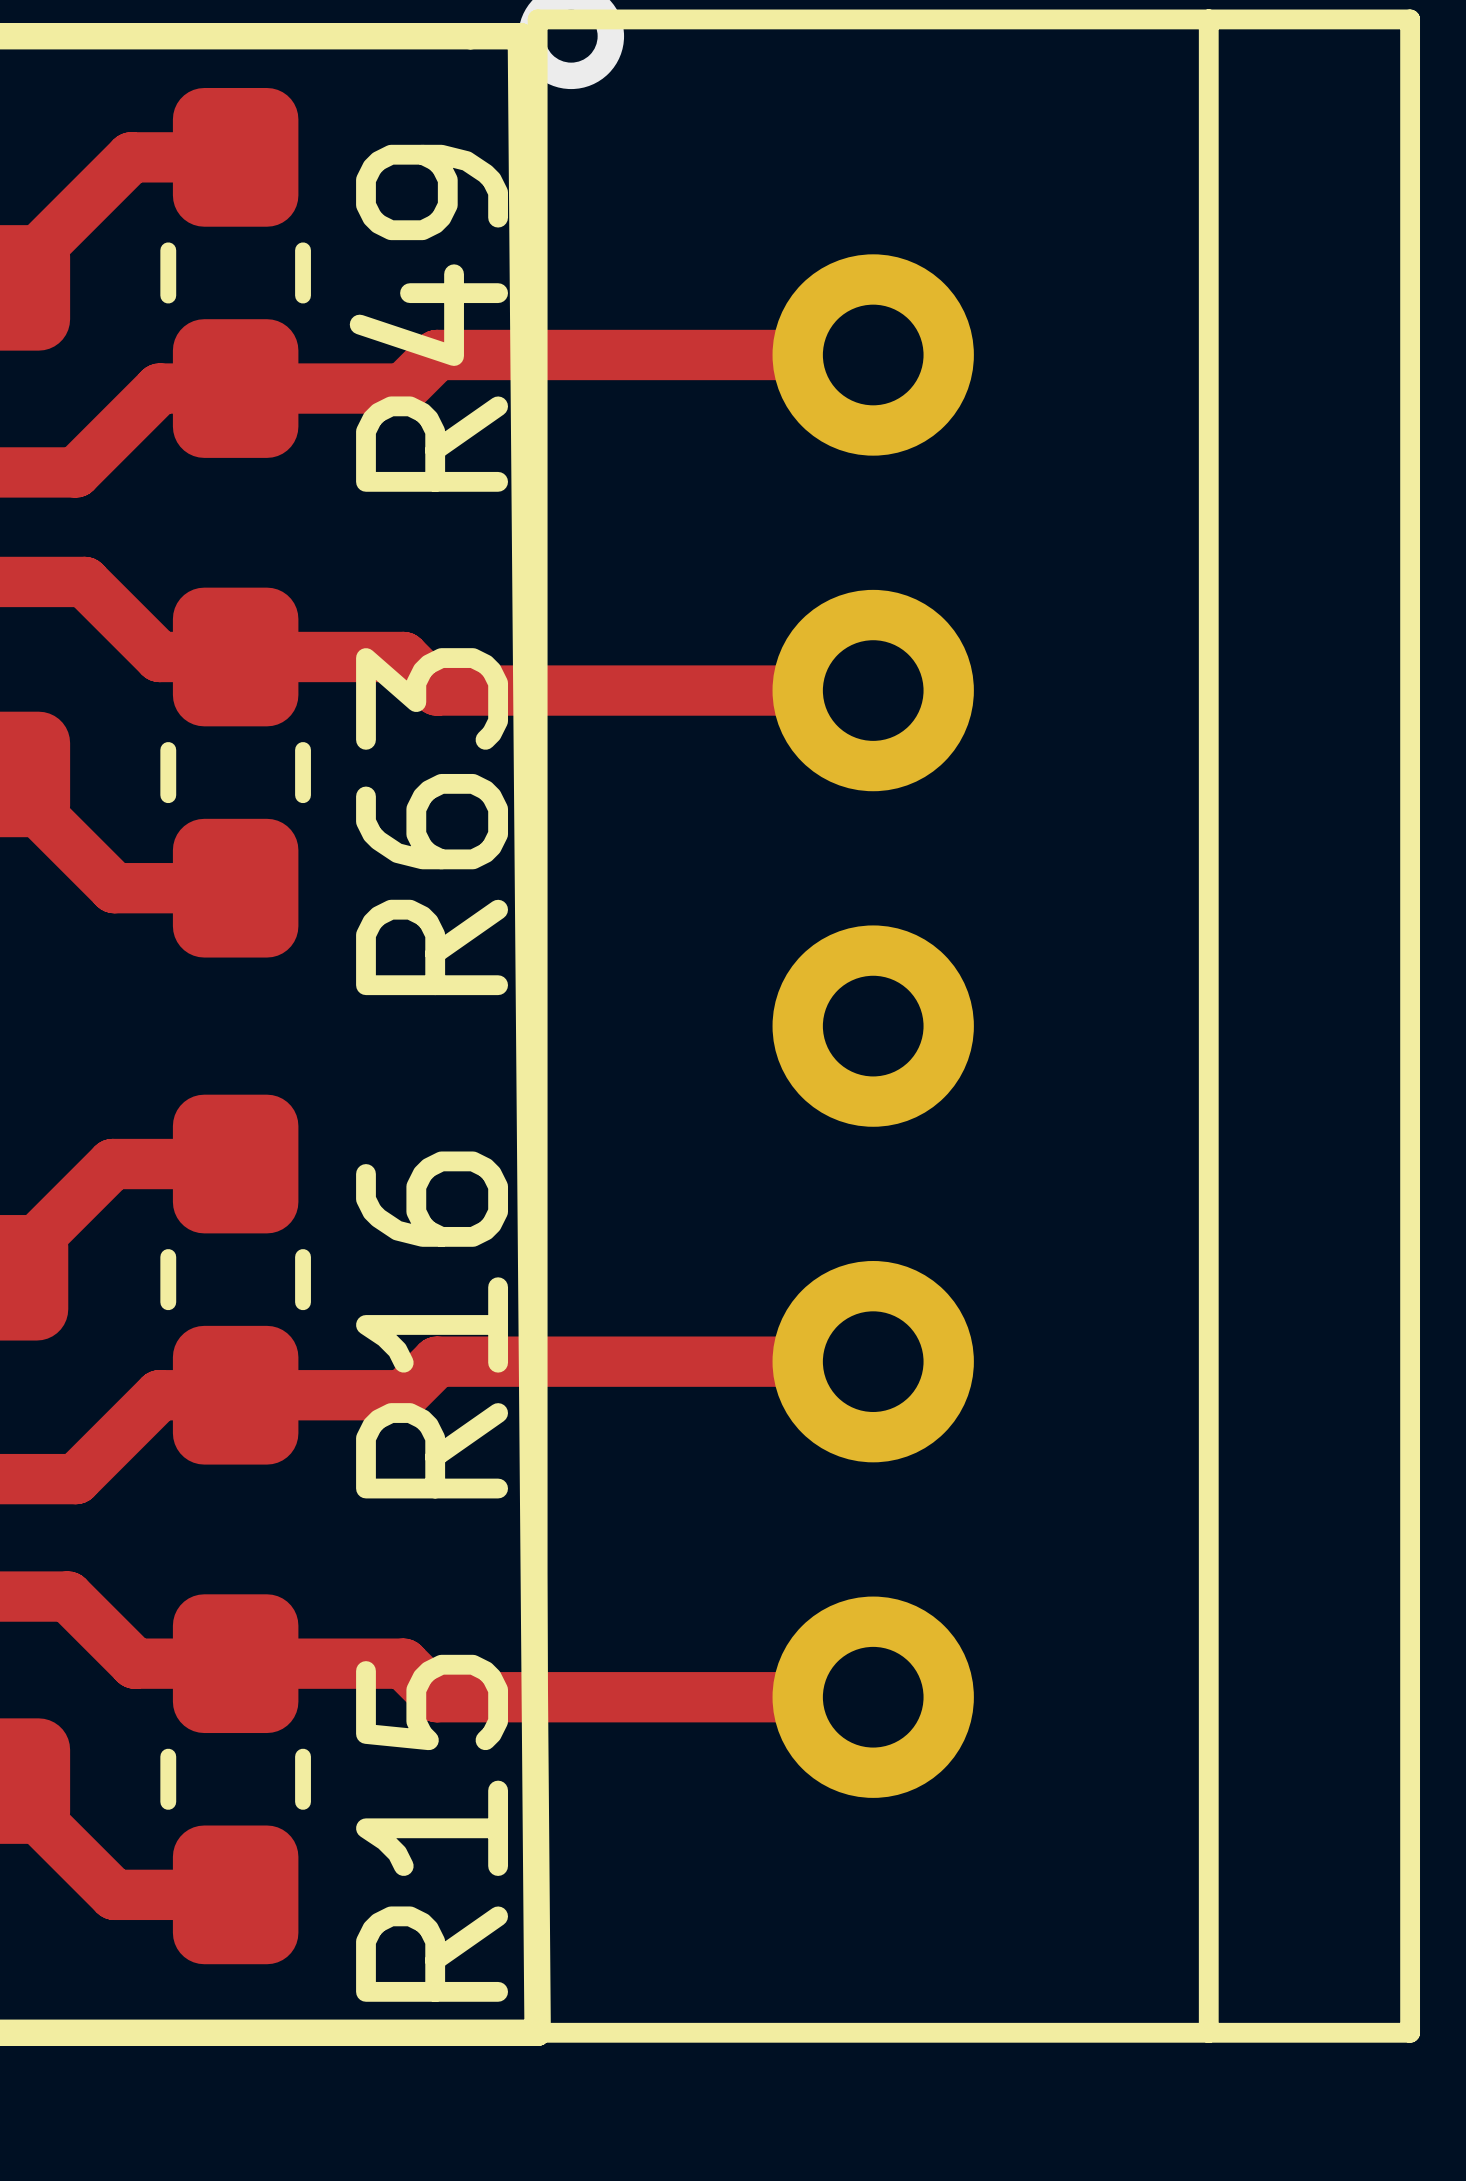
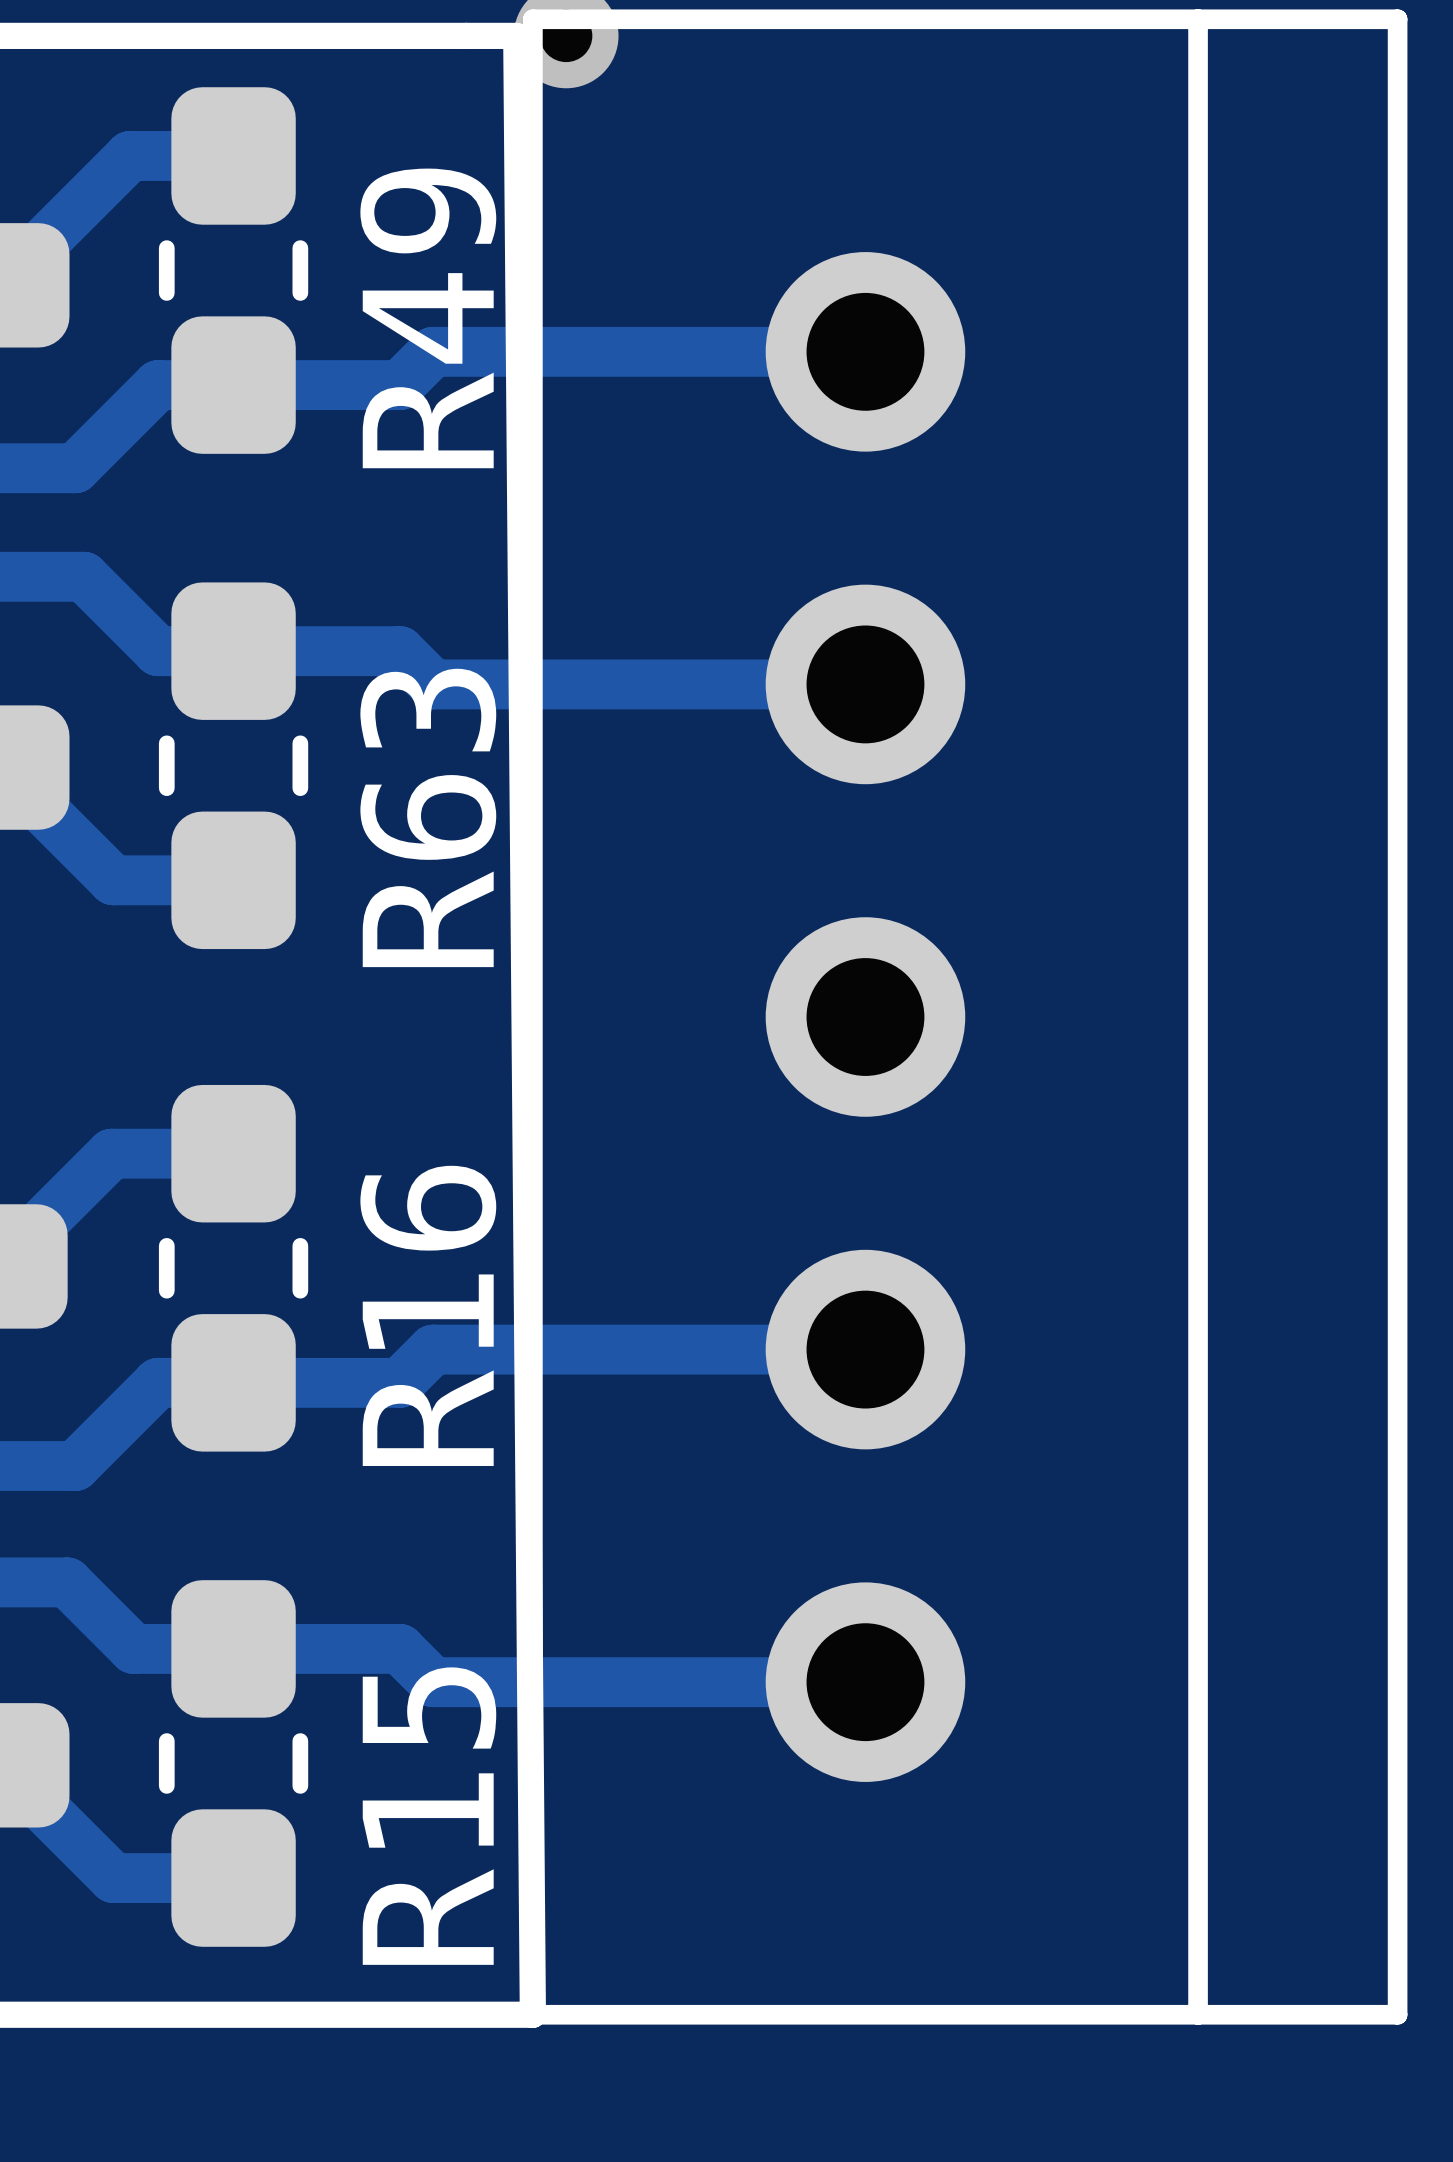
part footprint: [527, 9, 1421, 2043] -> [523, 9, 1408, 2025]

